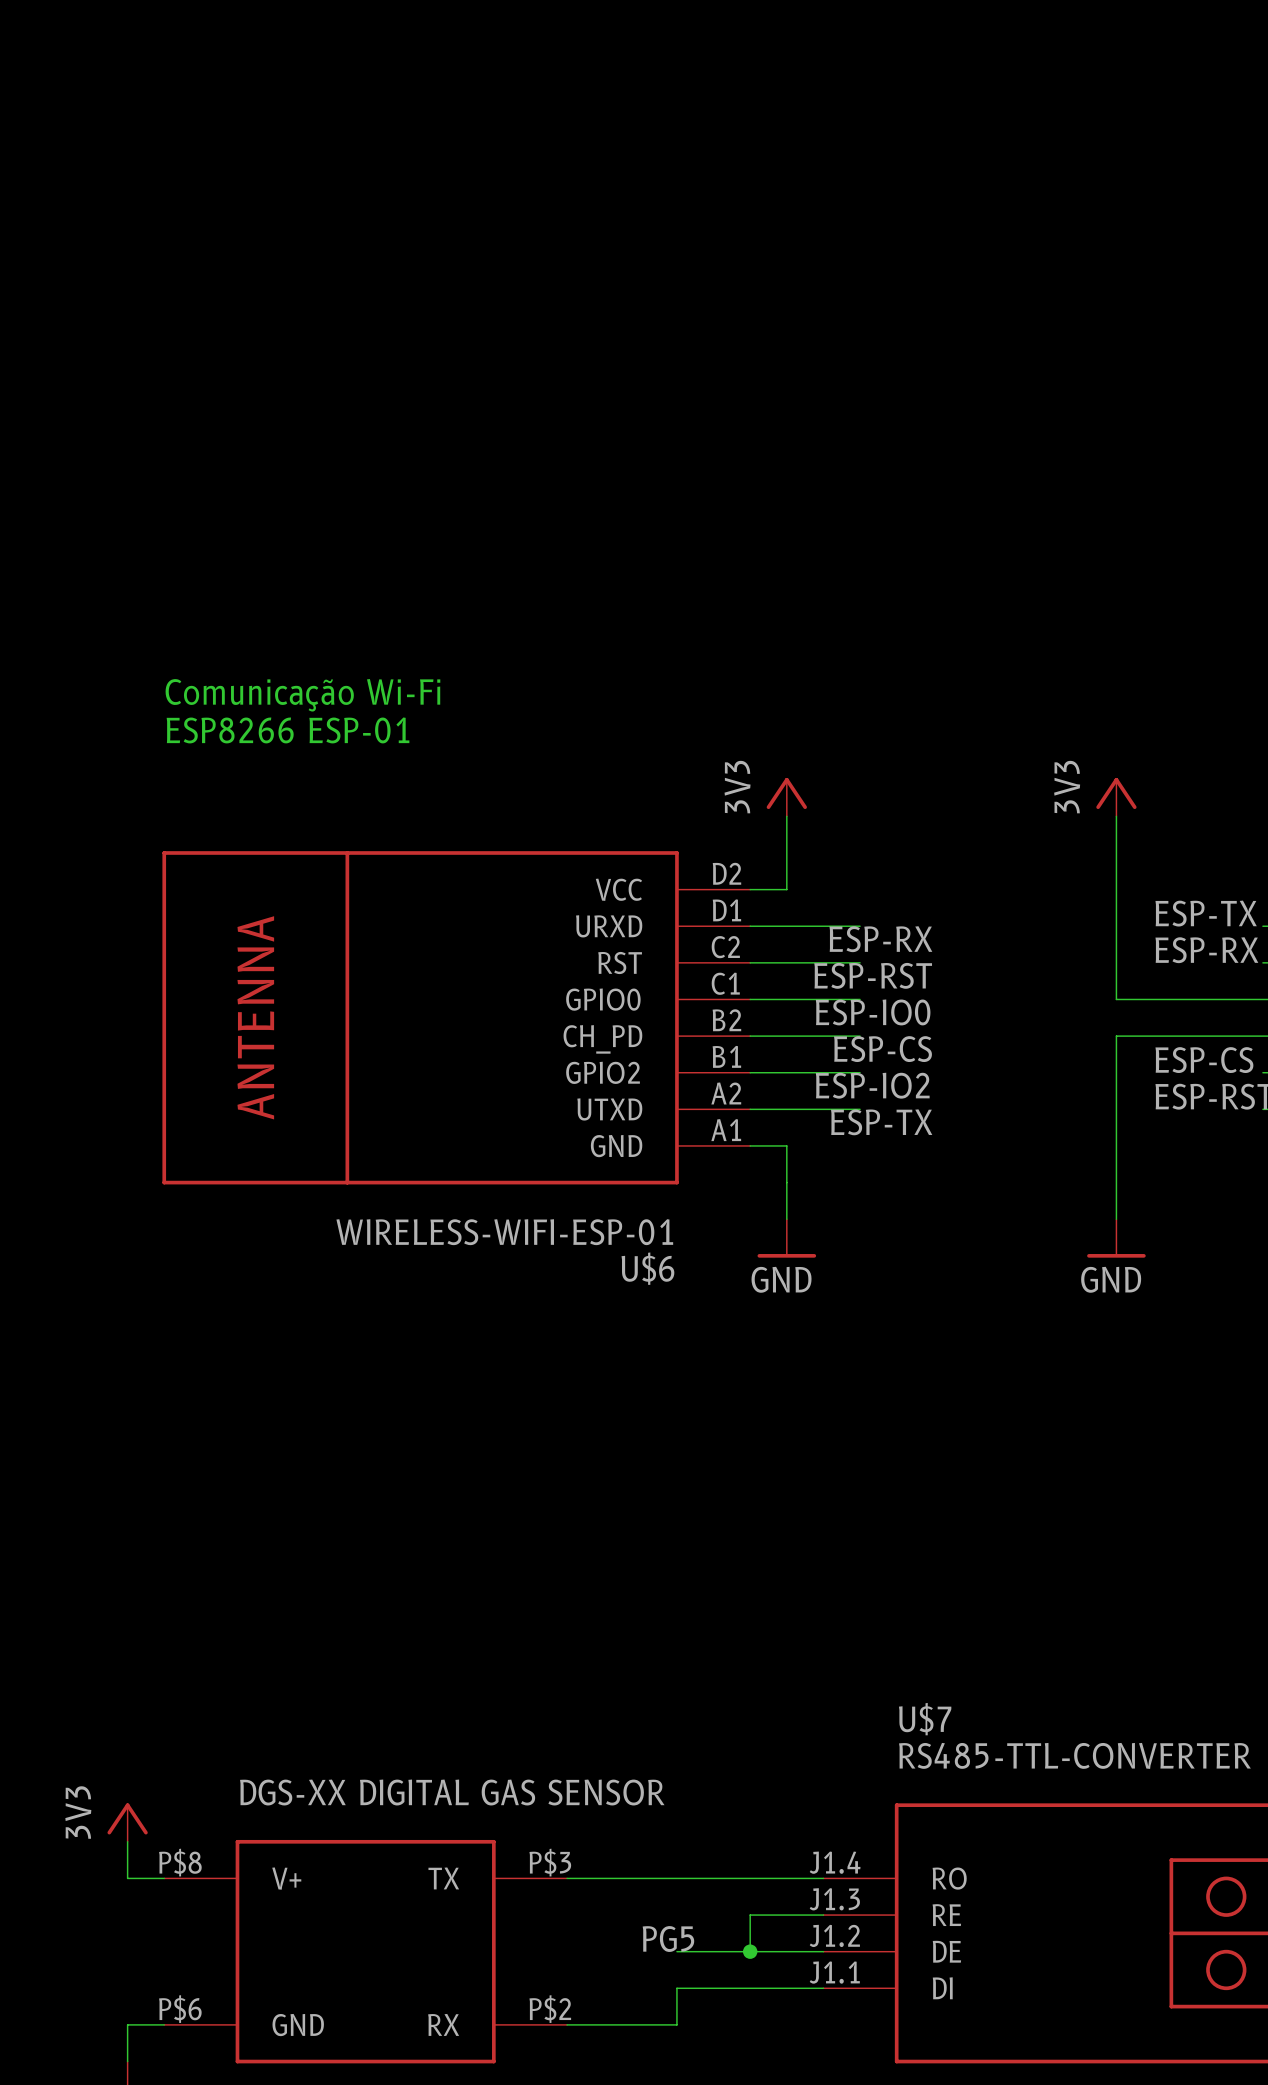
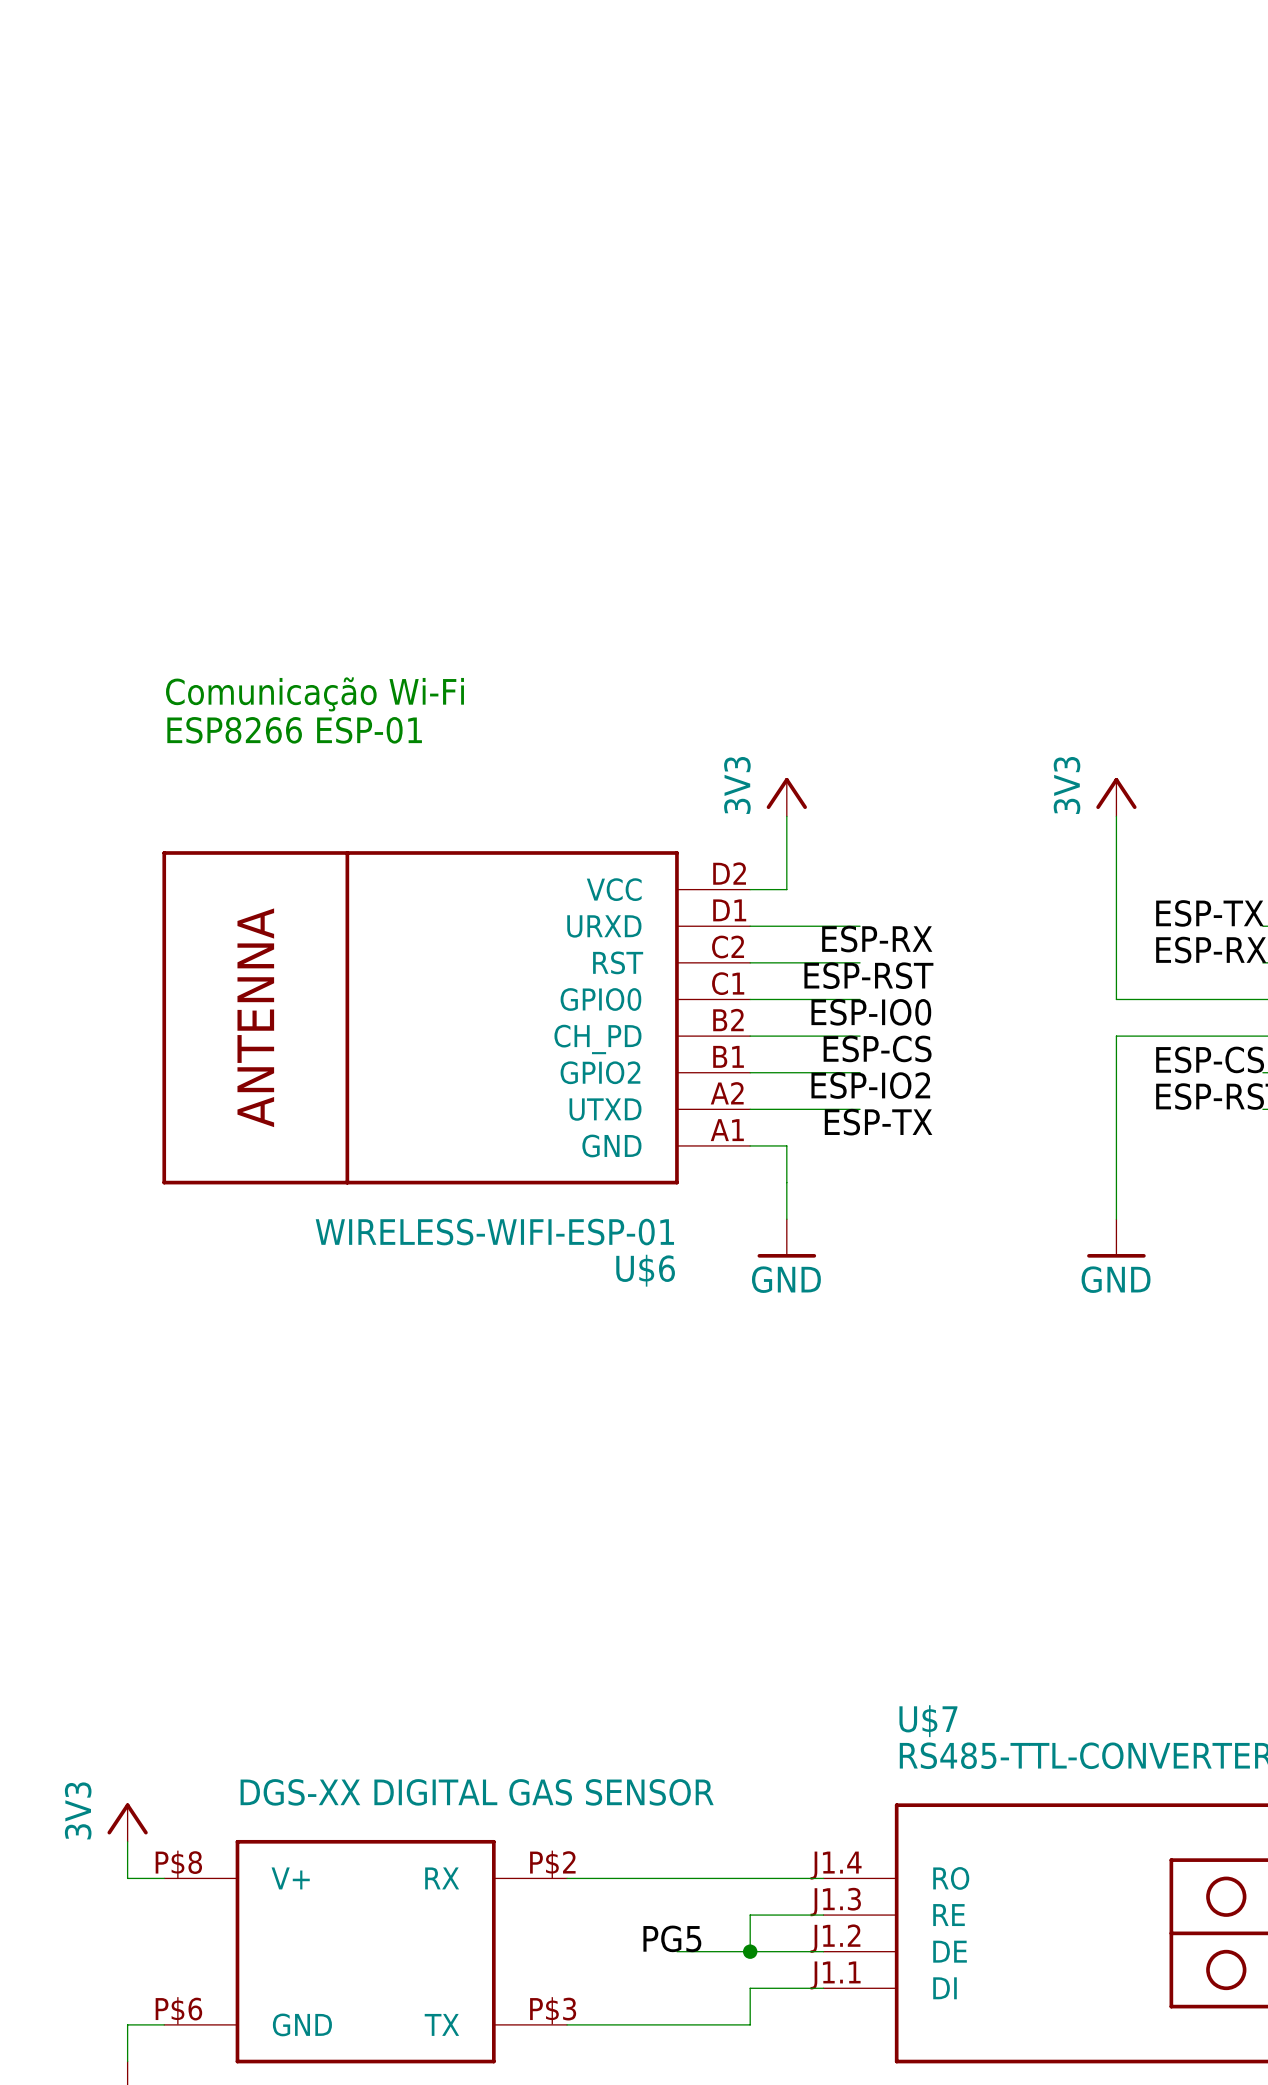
part pin number: P$3 (550, 1862) -> P$2 (552, 1864)
part pin name: TX (443, 1878) -> RX (442, 1878)
wire: (750, 1988) (676, 1988) (676, 2024) -> (750, 1988) (750, 2024) (676, 2024)
part pin number: P$2 (550, 2009) -> P$3 (553, 2010)
part pin name: RX (443, 2024) -> TX (441, 2024)

